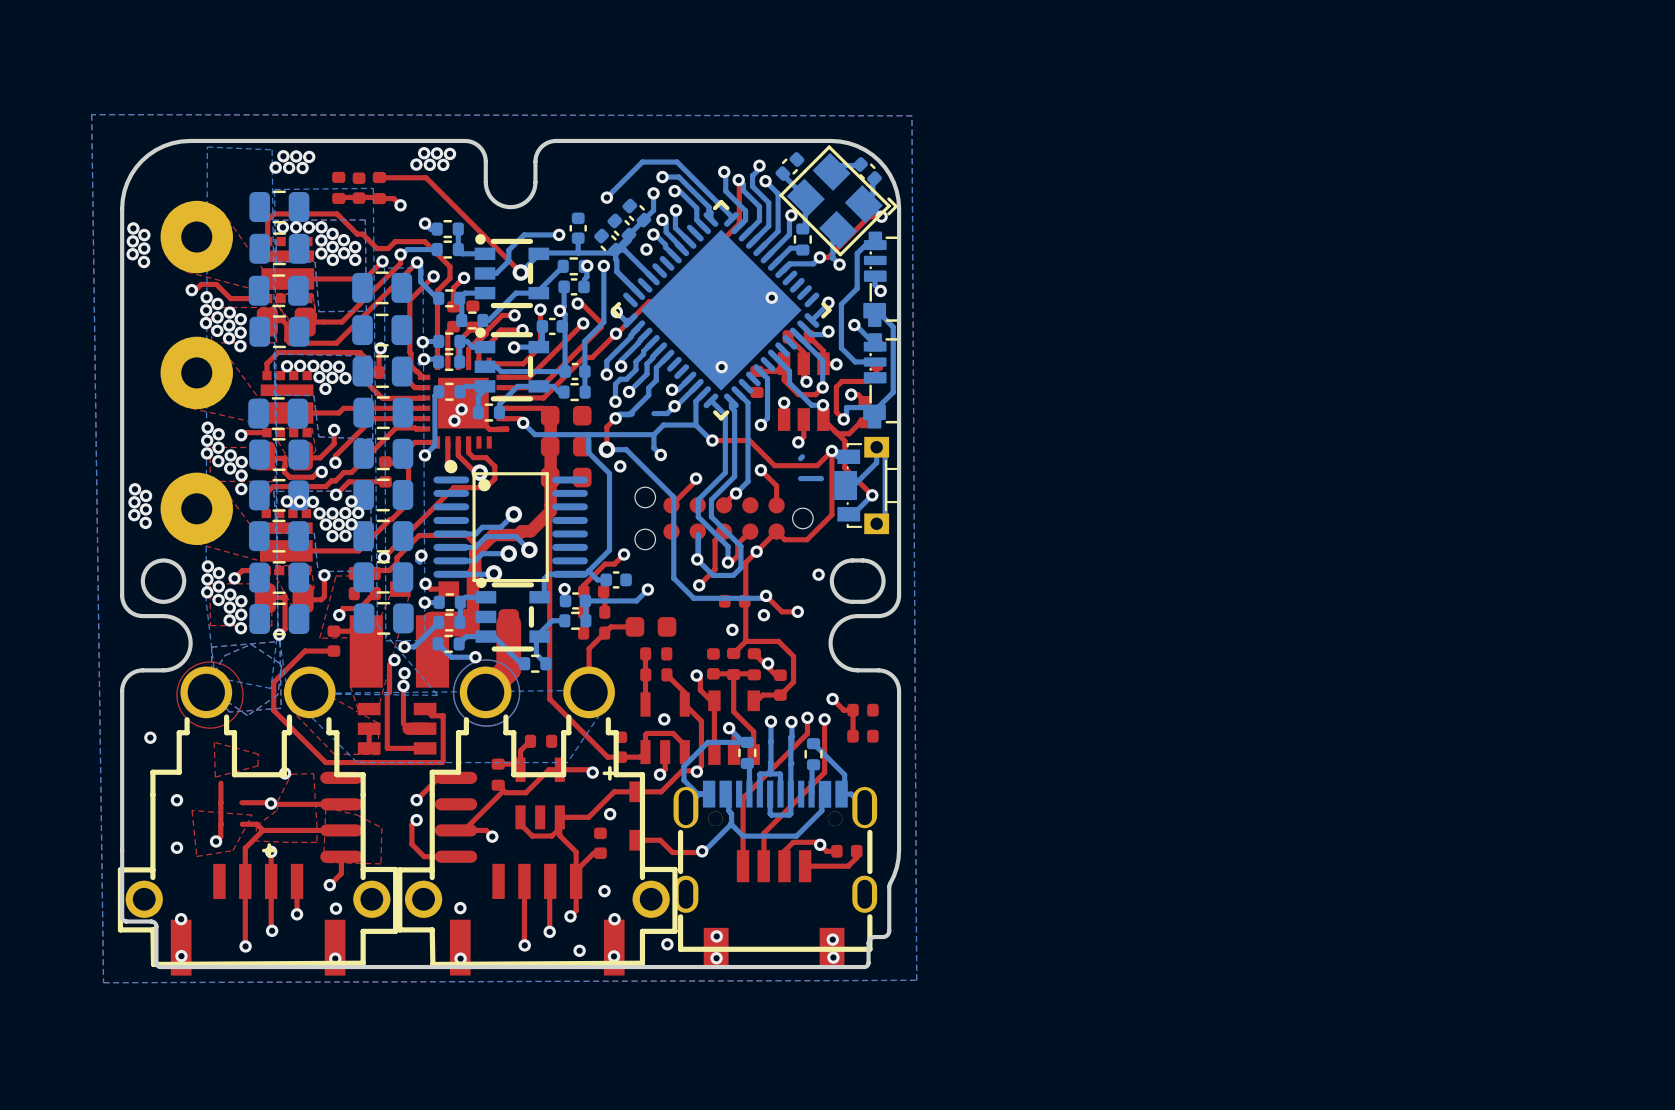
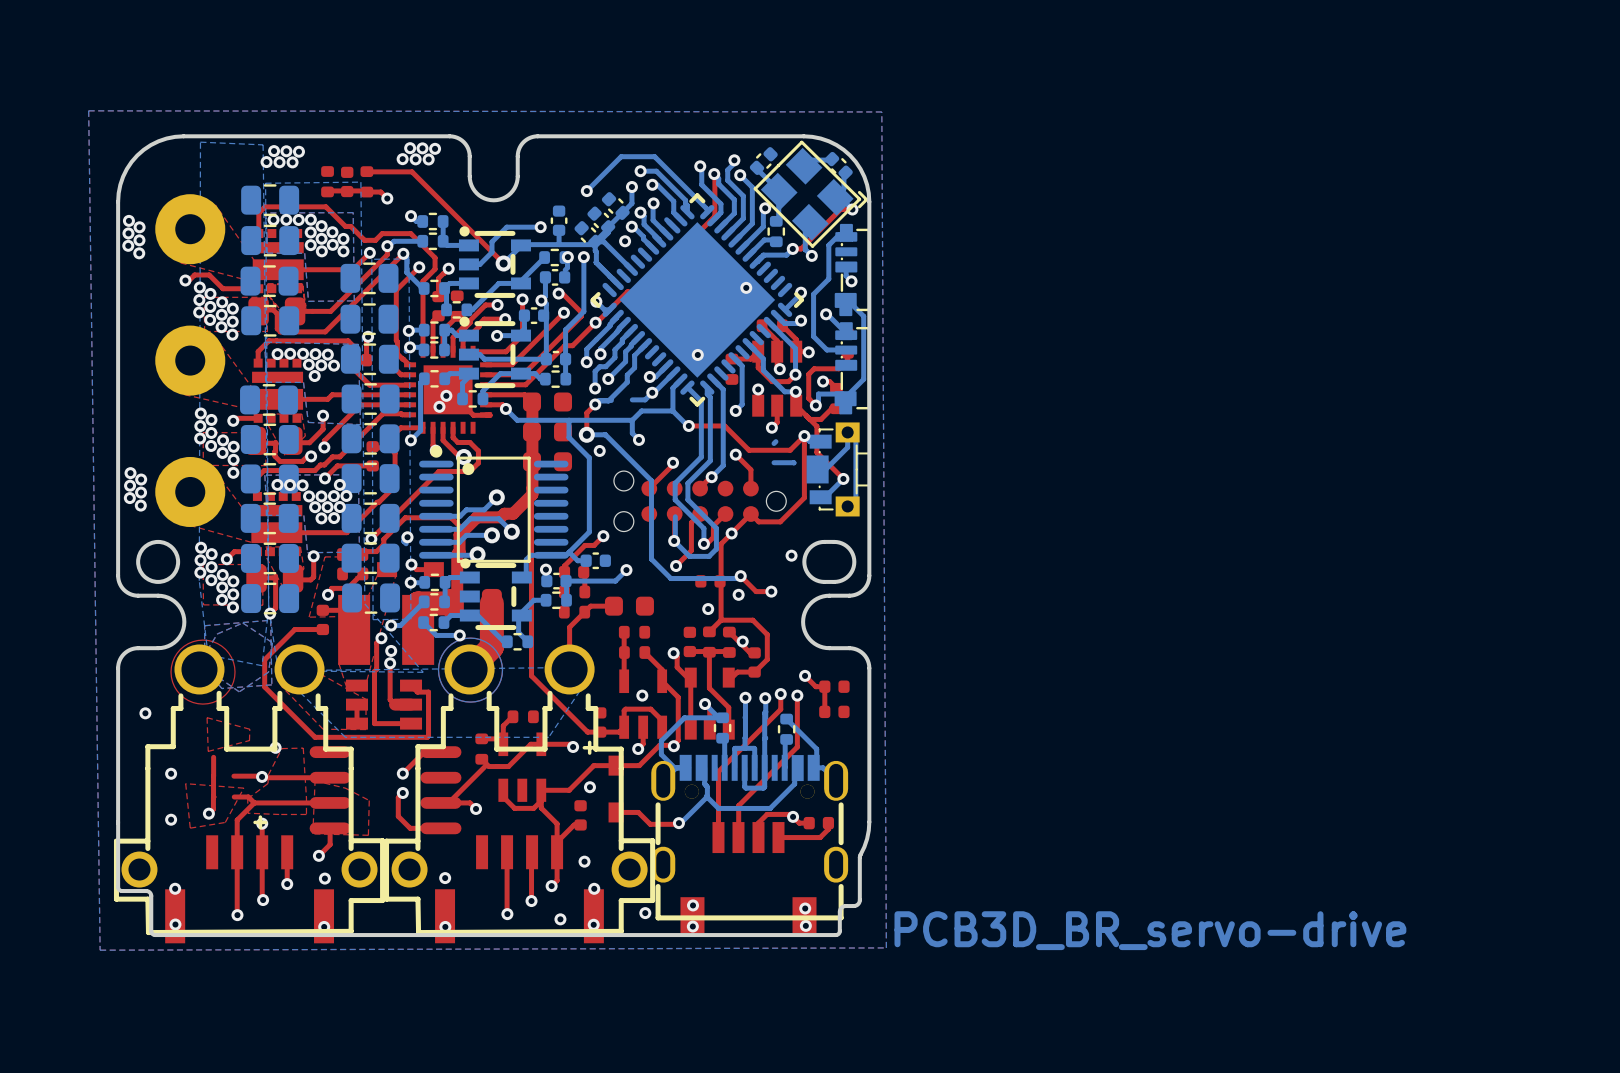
text: none -> PCB3D_BR_servo-drive (1150, 930)

